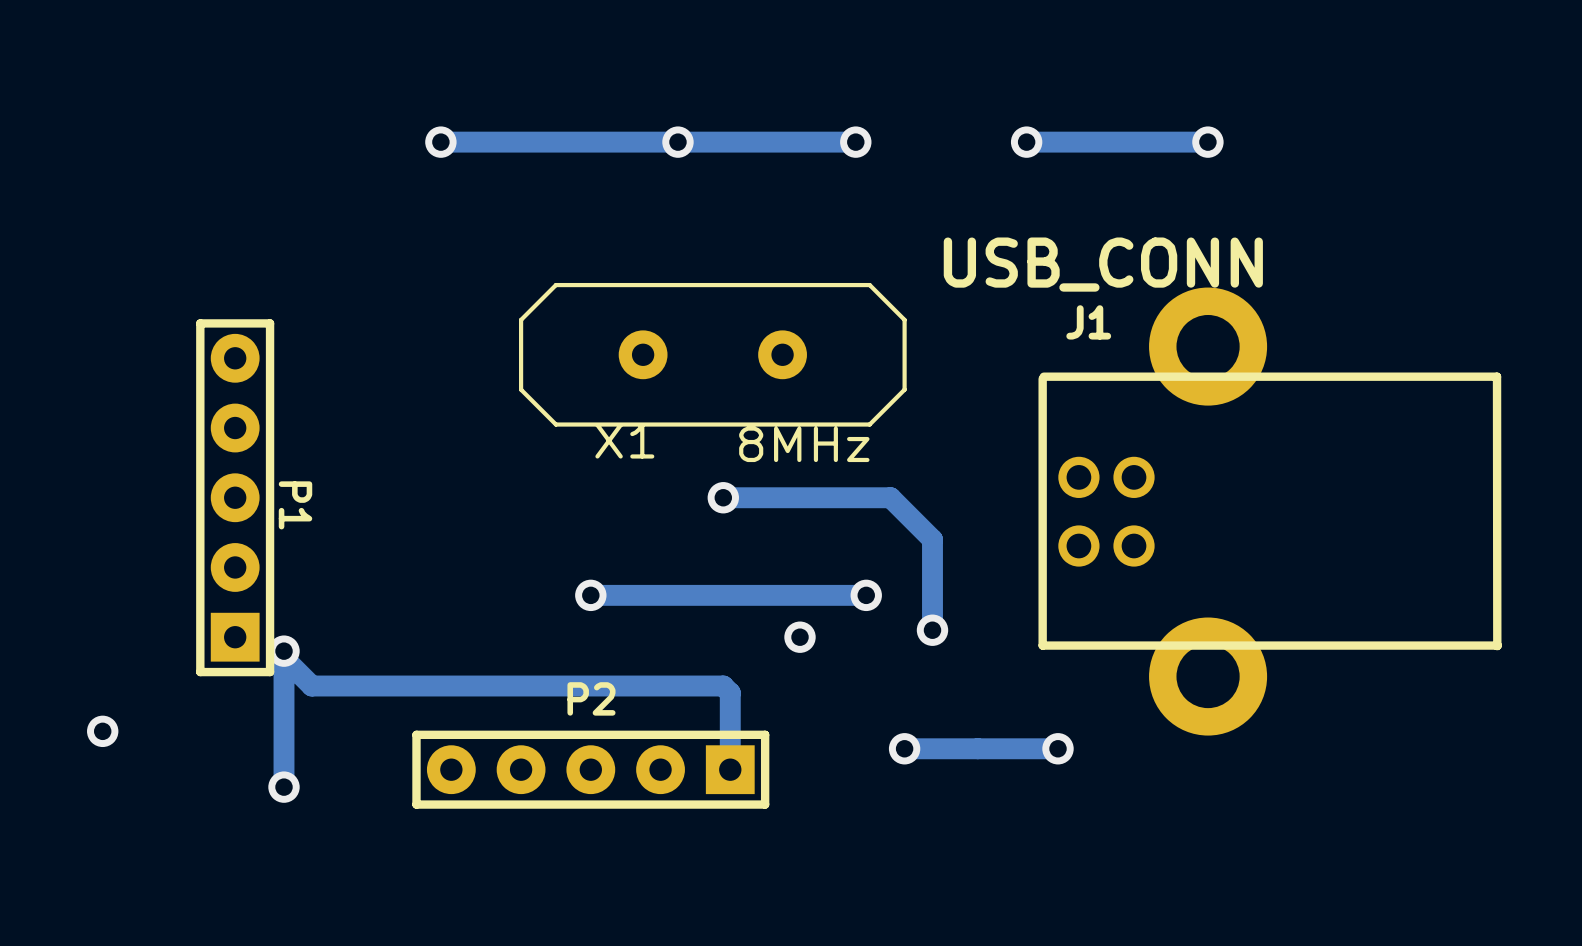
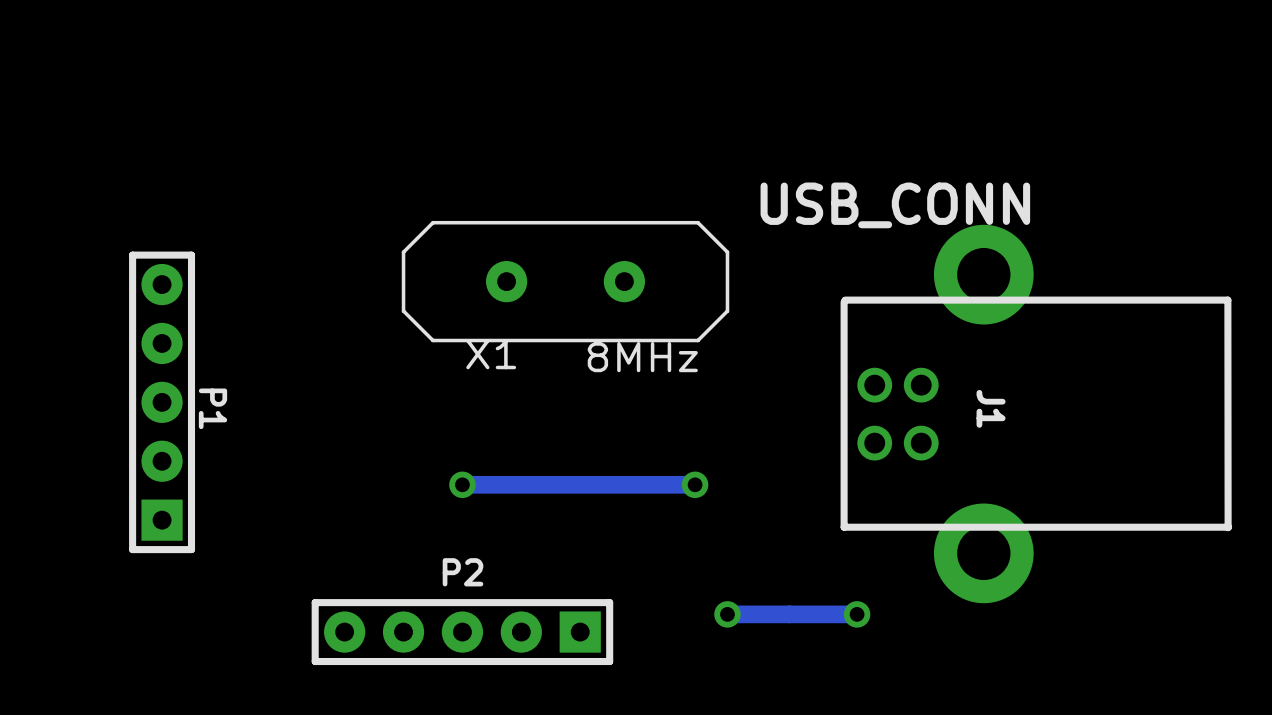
via: (440, 142) -> none
via: (677, 142) -> none
track: (855, 142) (440, 142) -> none
via: (855, 142) -> none
via: (1026, 142) -> none
track: (1207, 142) (1026, 142) -> none
via: (1207, 142) -> none
J1 name rotation: 0° (1088, 322) -> 90° clockwise (991, 408)
J1 name position: J1 (1088, 322) -> J1 (991, 408)
track: (723, 497) (890, 497) (932, 539) (932, 630) -> none
via: (723, 497) -> none
via: (932, 630) -> none
via: (800, 637) -> none
track: (284, 651) (284, 787) (284, 651) -> none
via: (284, 651) -> none
track: (284, 654) (280, 654) (311, 686) (723, 686) (730, 692) (730, 769) -> none
via: (102, 731) -> none
via: (284, 787) -> none

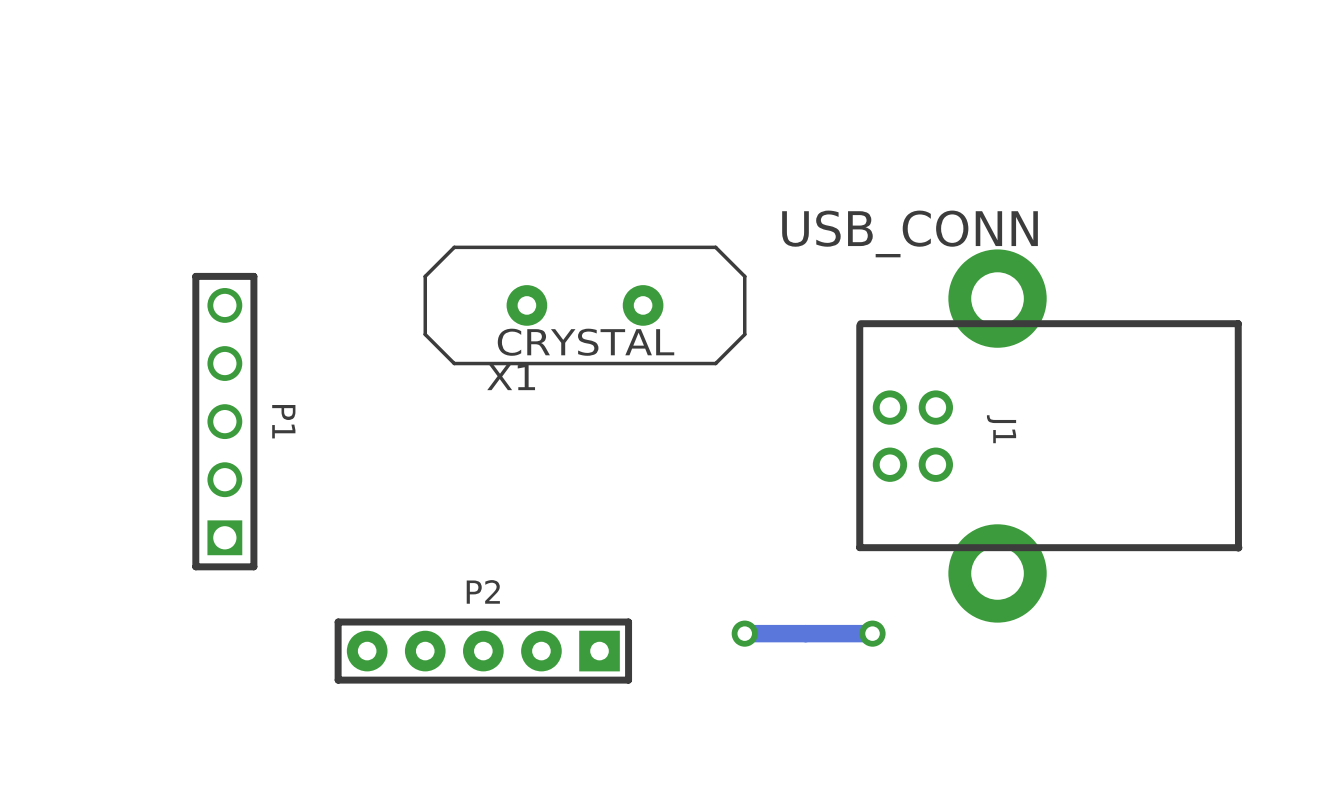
P1 footprint: [129, 251, 196, 554] -> [192, 272, 258, 571]
X1 value: 8MHz (642, 357) -> CRYSTAL (586, 342)
via: (462, 484) -> none
track: (695, 484) (462, 484) -> none
via: (695, 484) -> none

